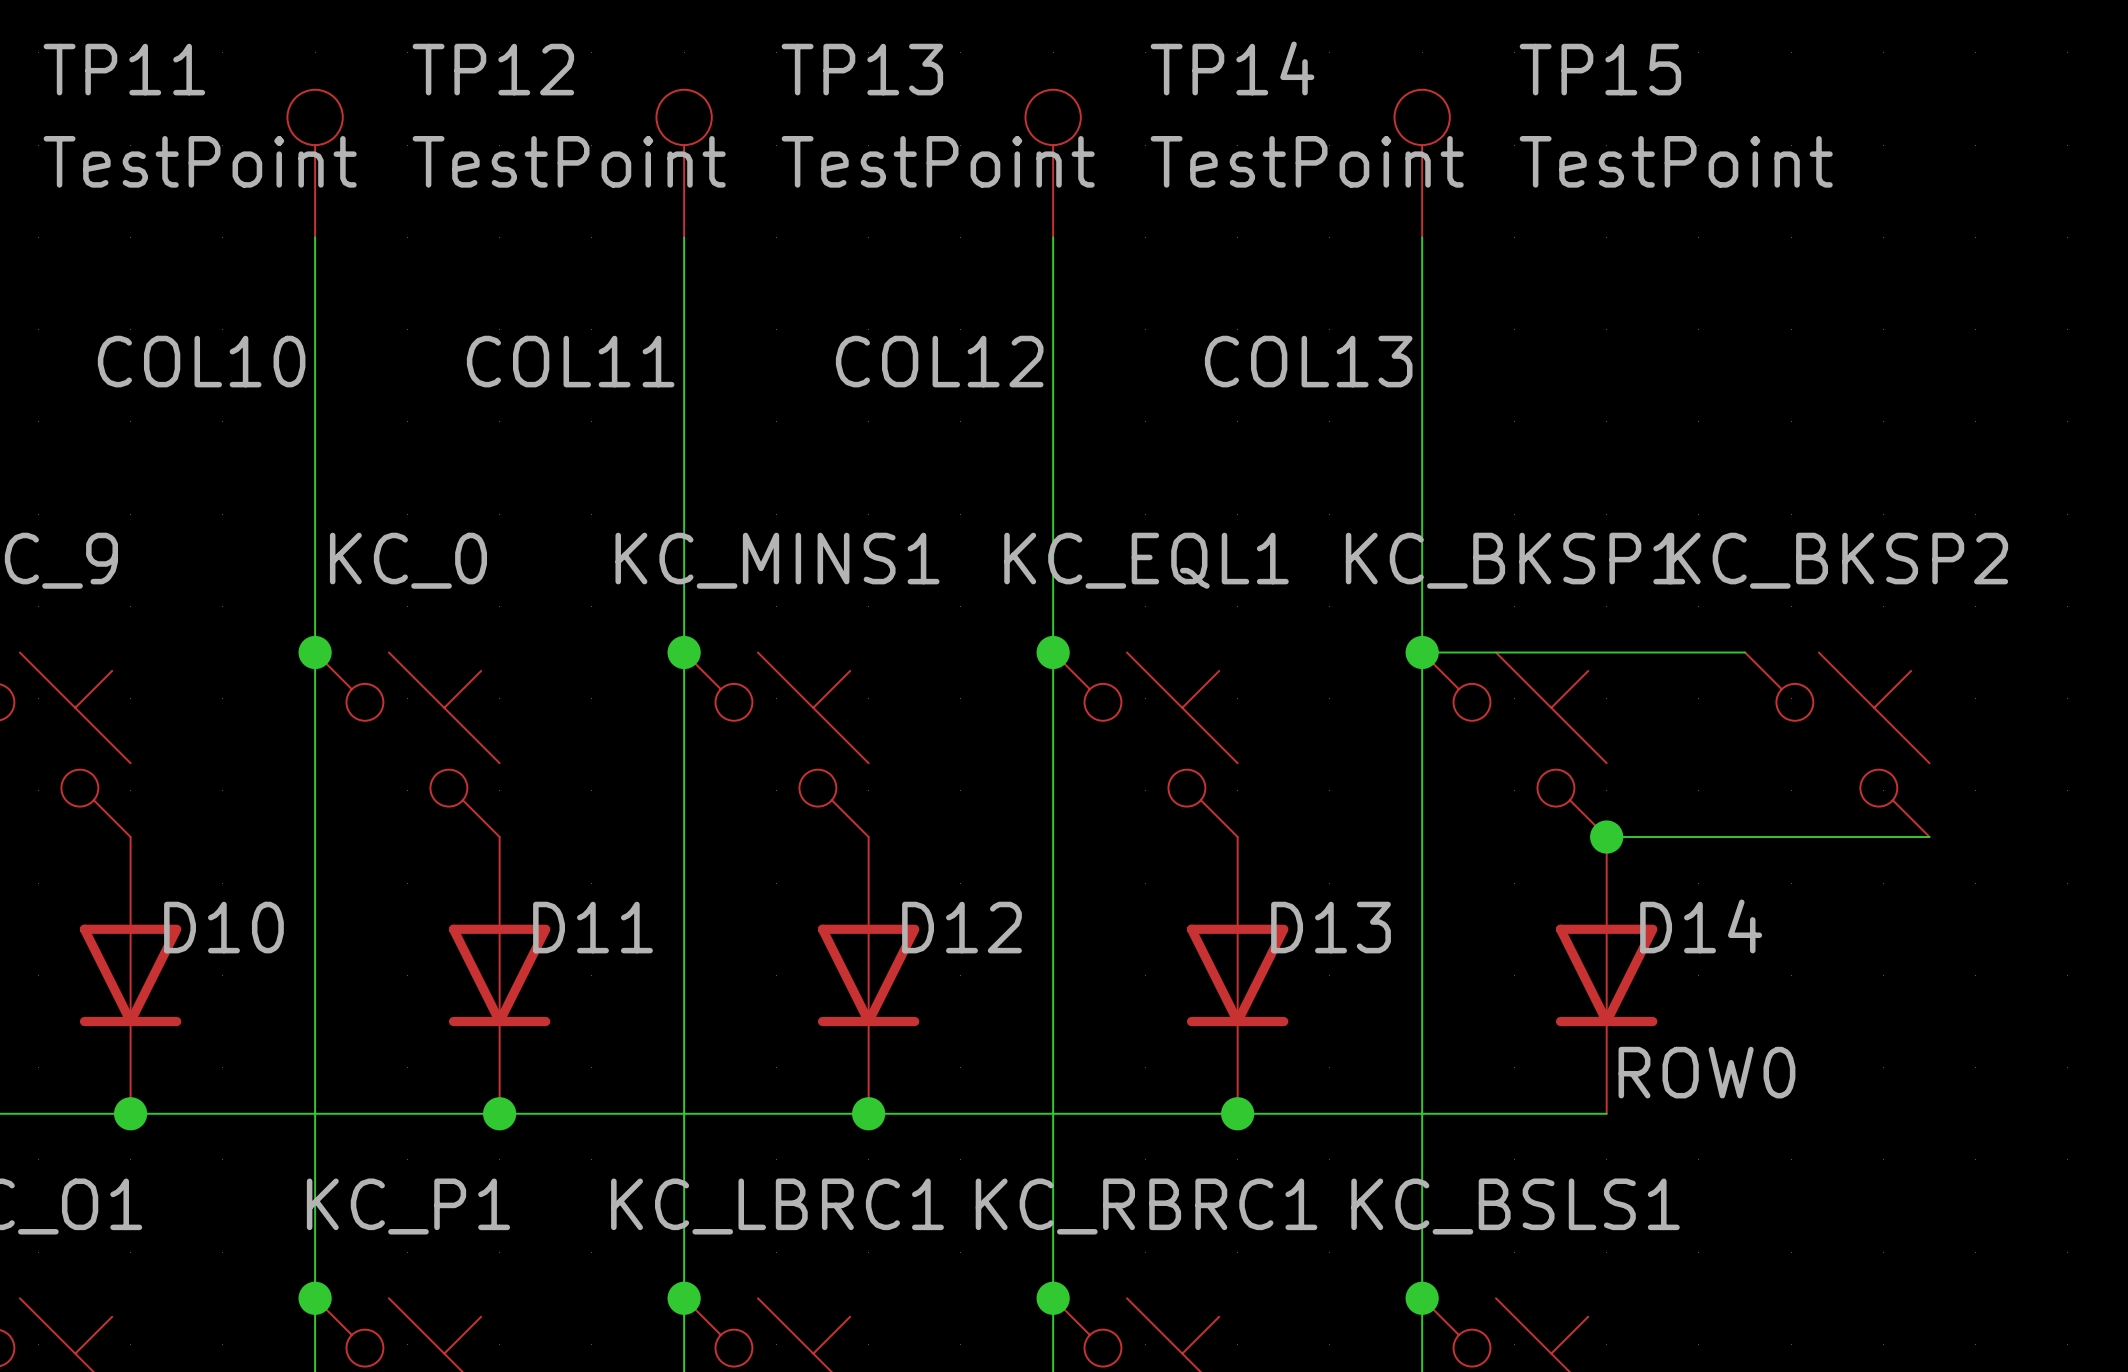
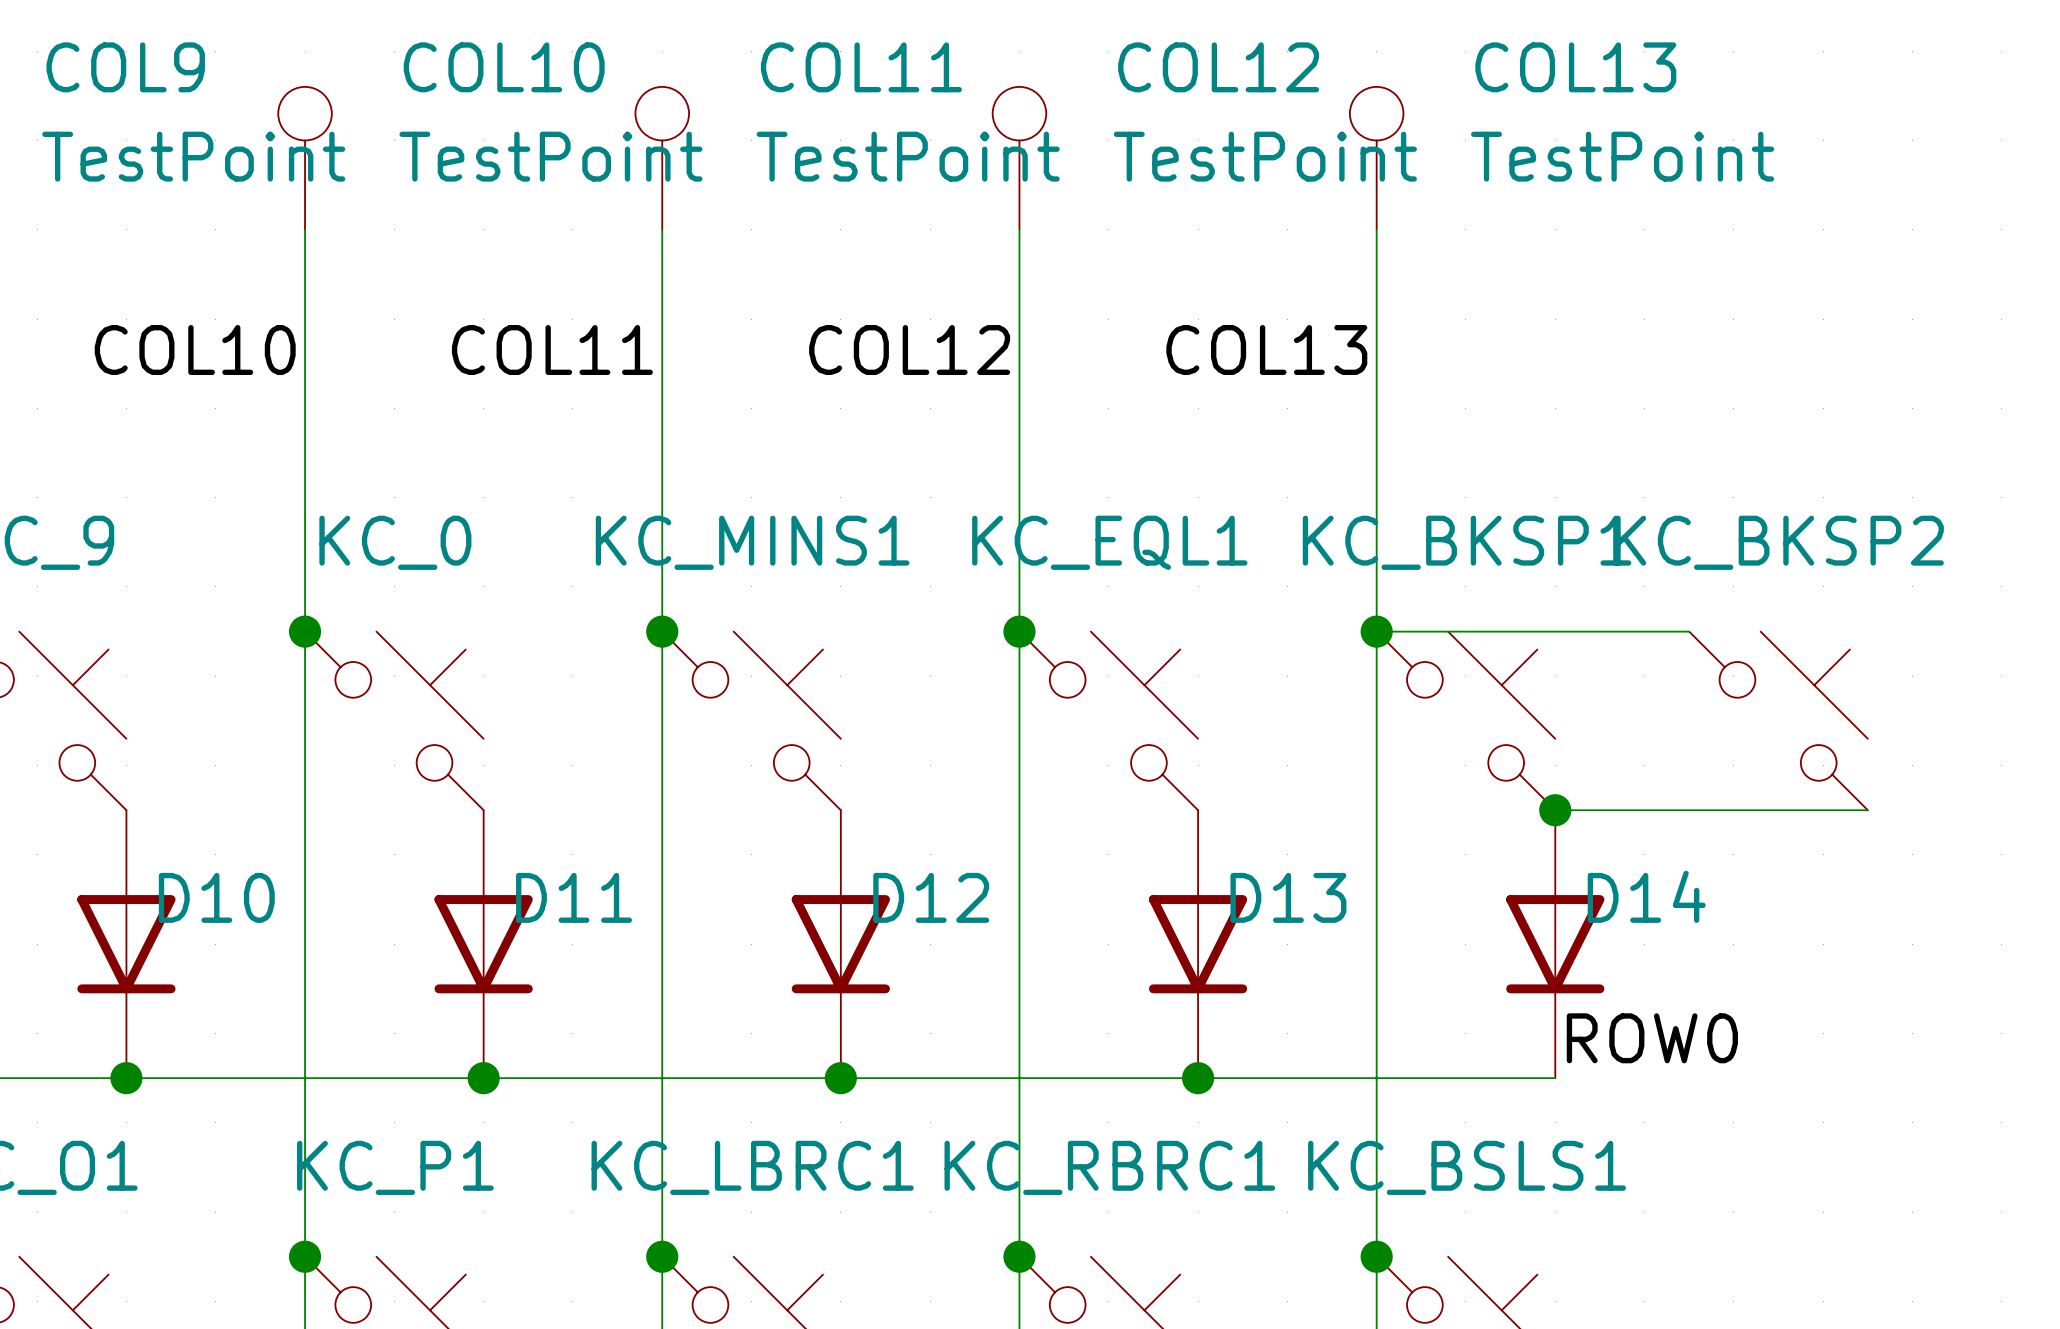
TP14 name: TP14 (1232, 68) -> COL12 (1218, 67)
TP11 name: TP11 (124, 69) -> COL9 (125, 67)
TP12 name: TP12 (493, 69) -> COL10 (504, 67)
TP13 name: TP13 (862, 69) -> COL11 (861, 67)
TP15 name: TP15 (1600, 69) -> COL13 (1575, 67)

